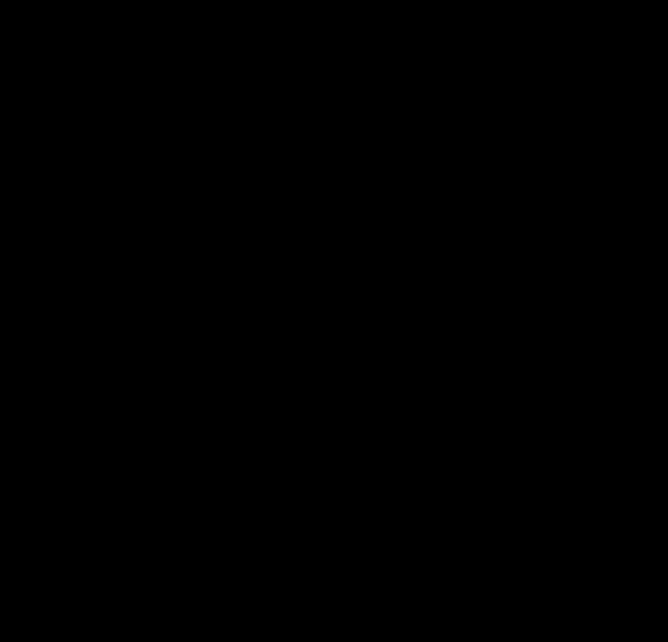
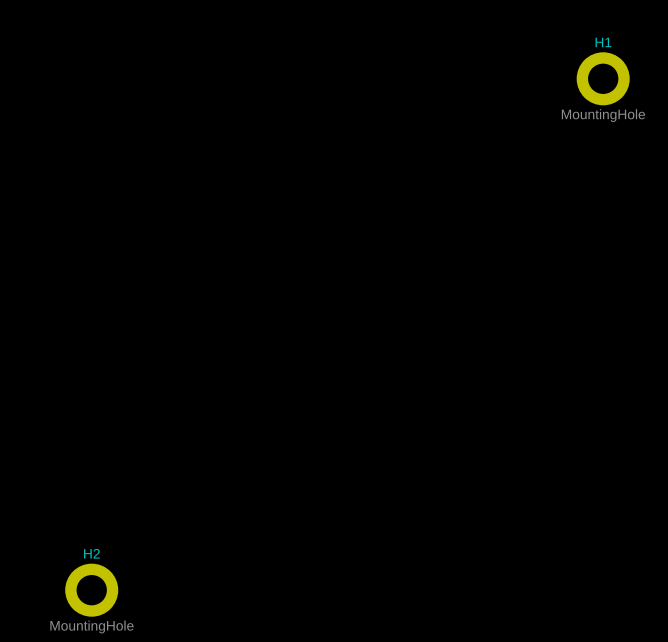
H1: none -> MountingHole (603, 78)
H2: none -> MountingHole (91, 590)

